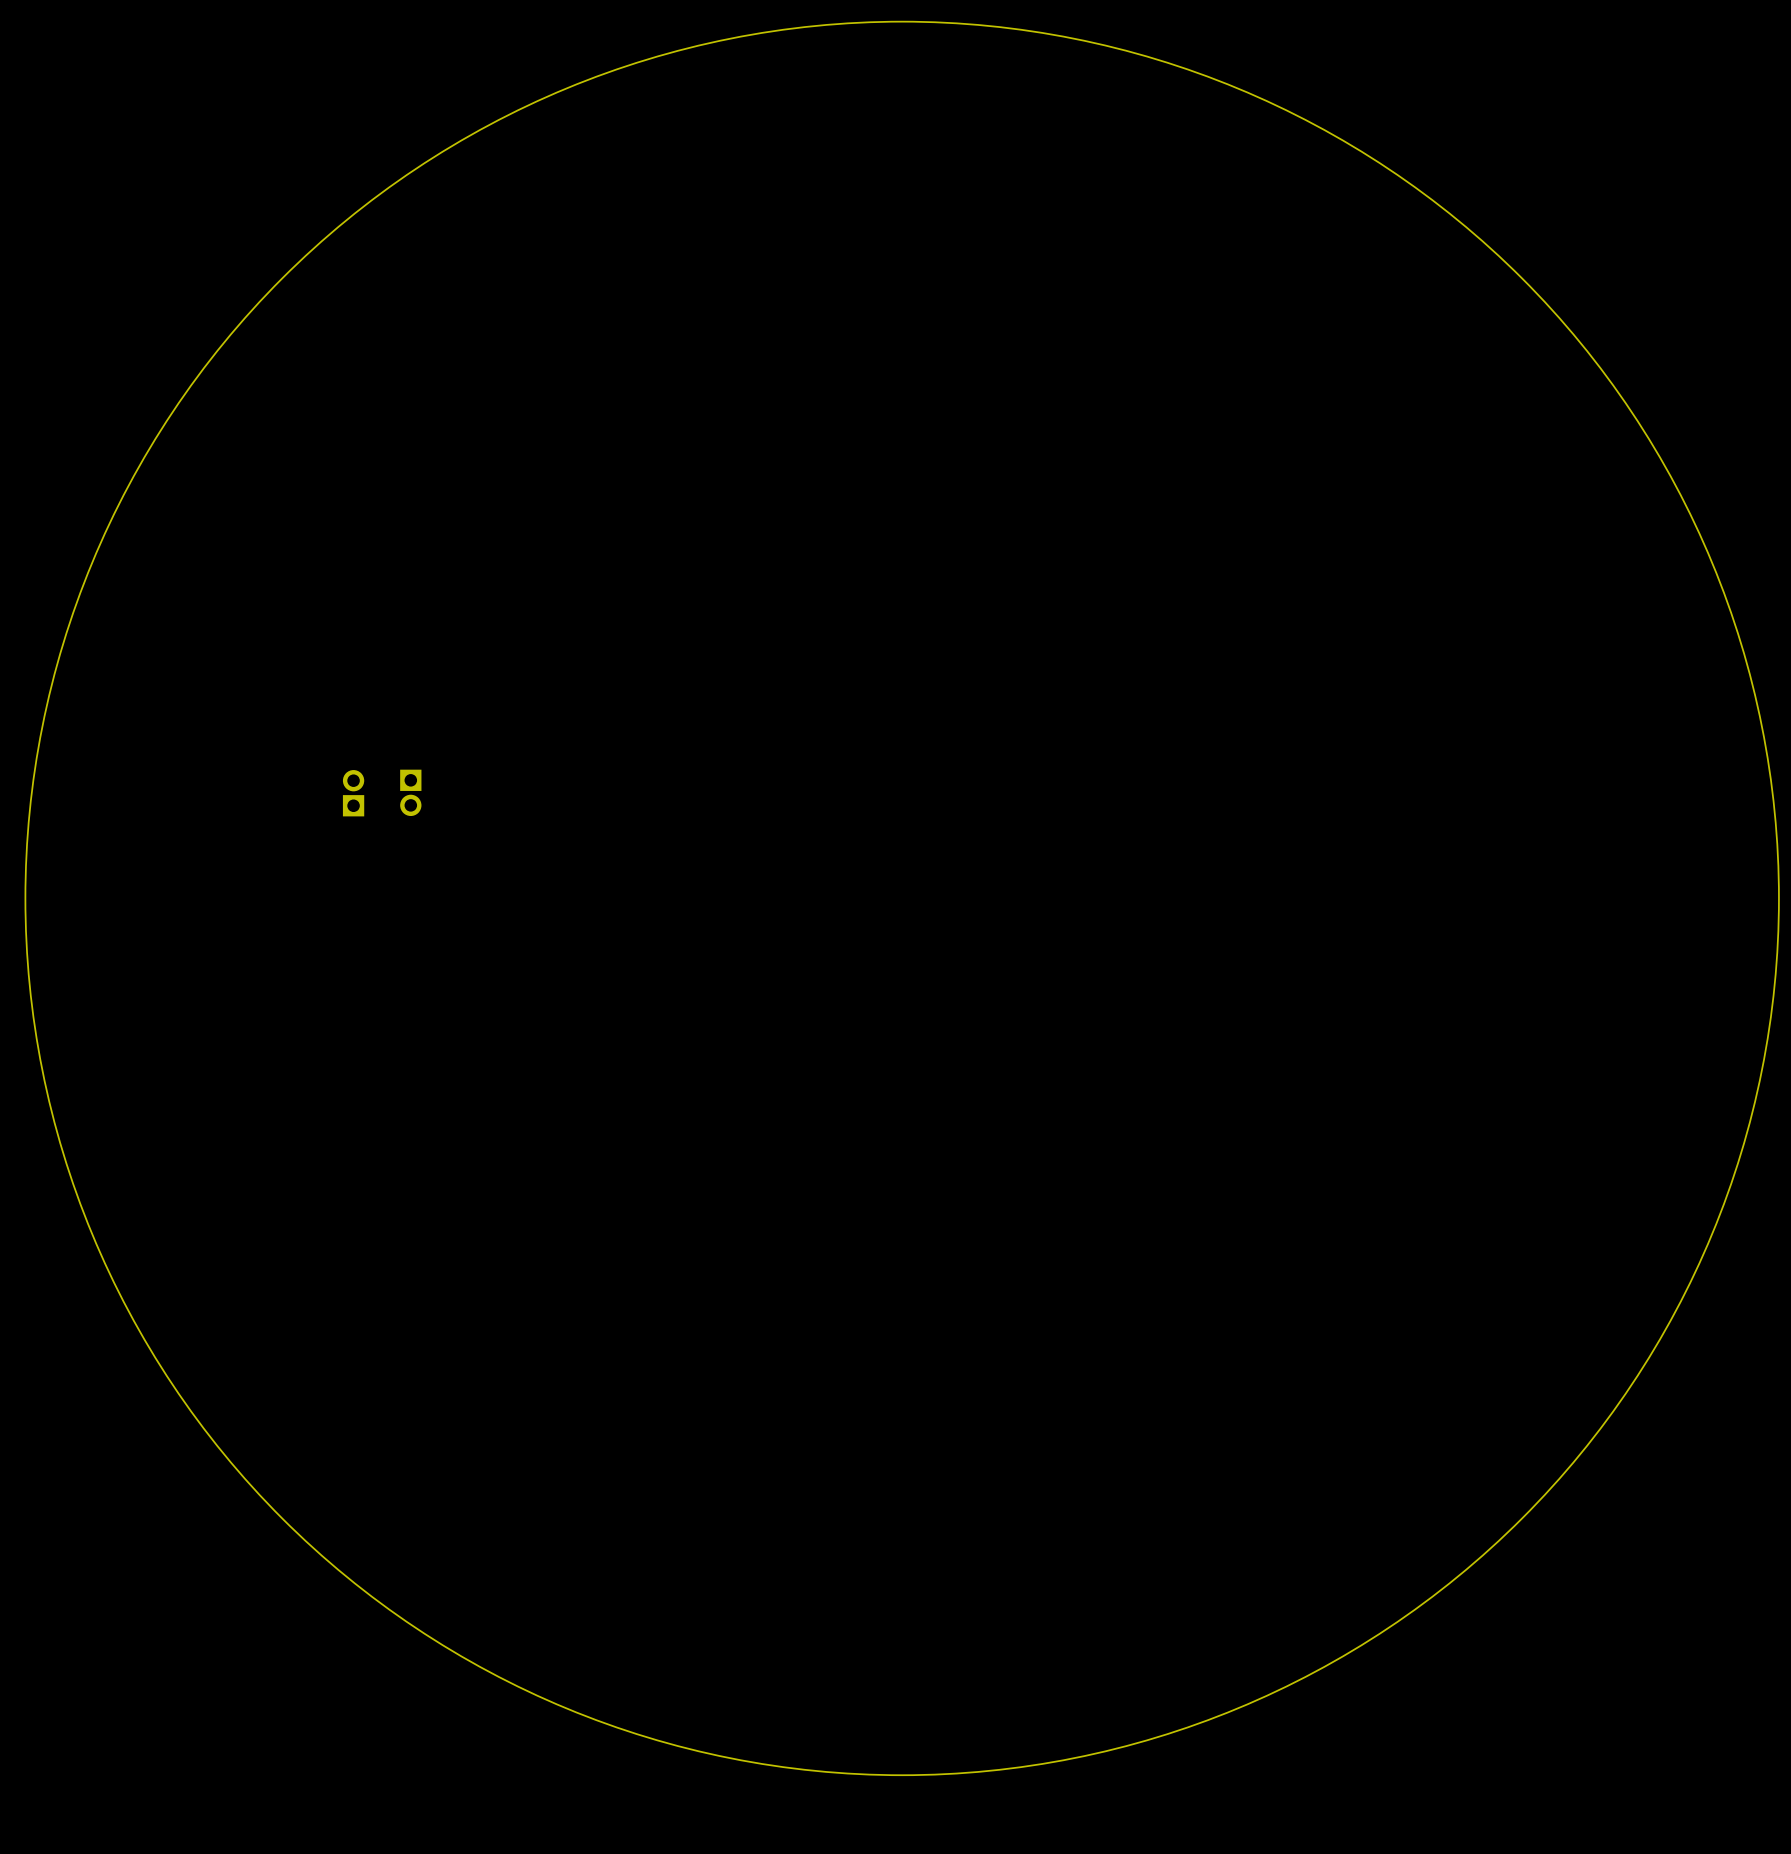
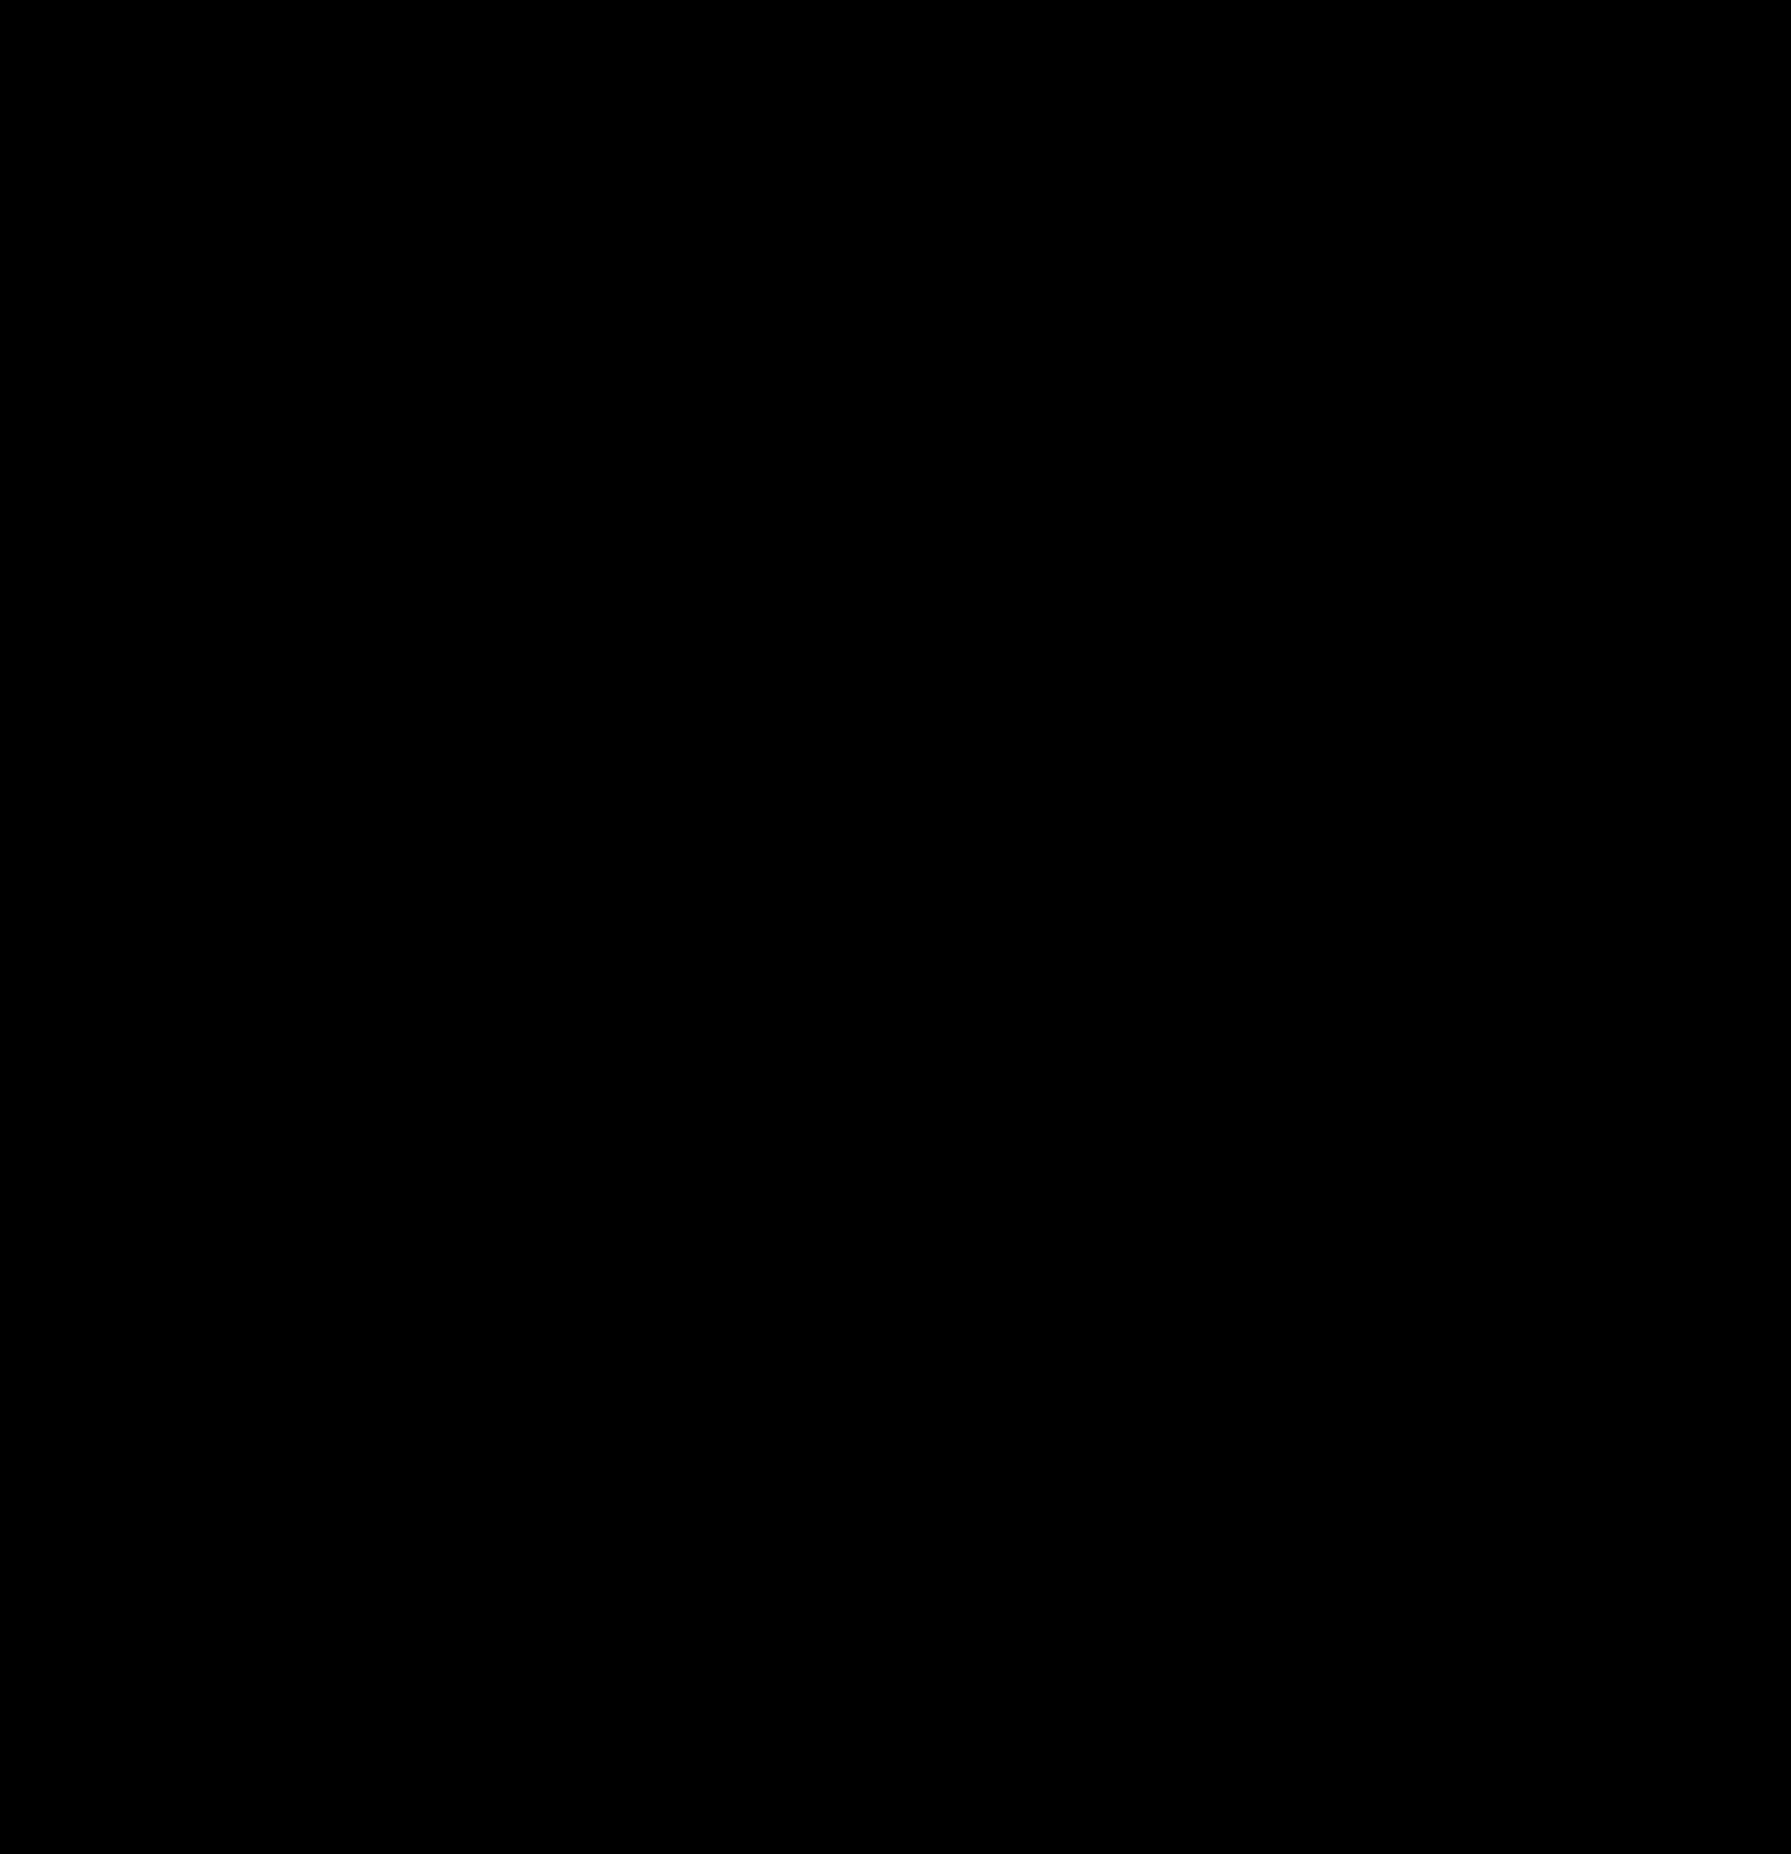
round board edge: [24, 21, 1780, 1776] -> none
part: (410, 792) -> none
part: (353, 793) -> none

